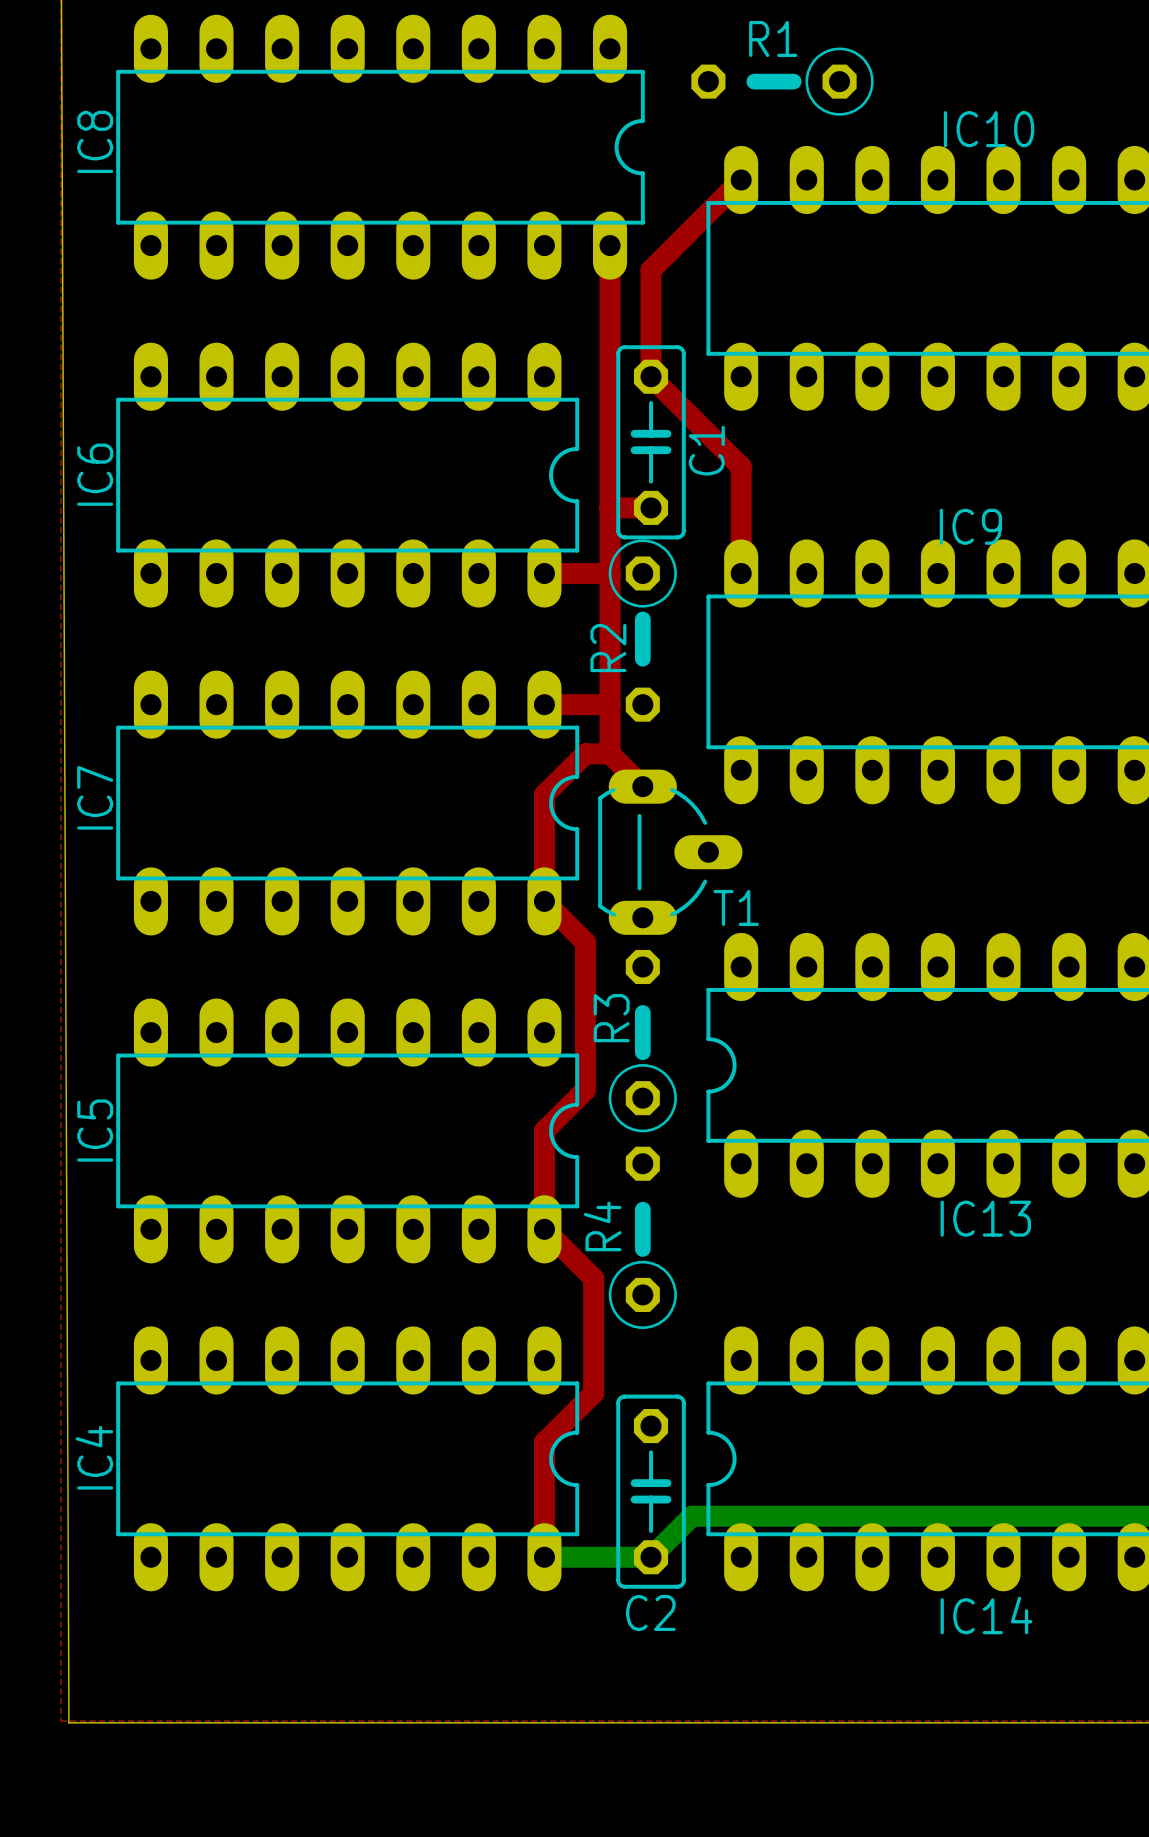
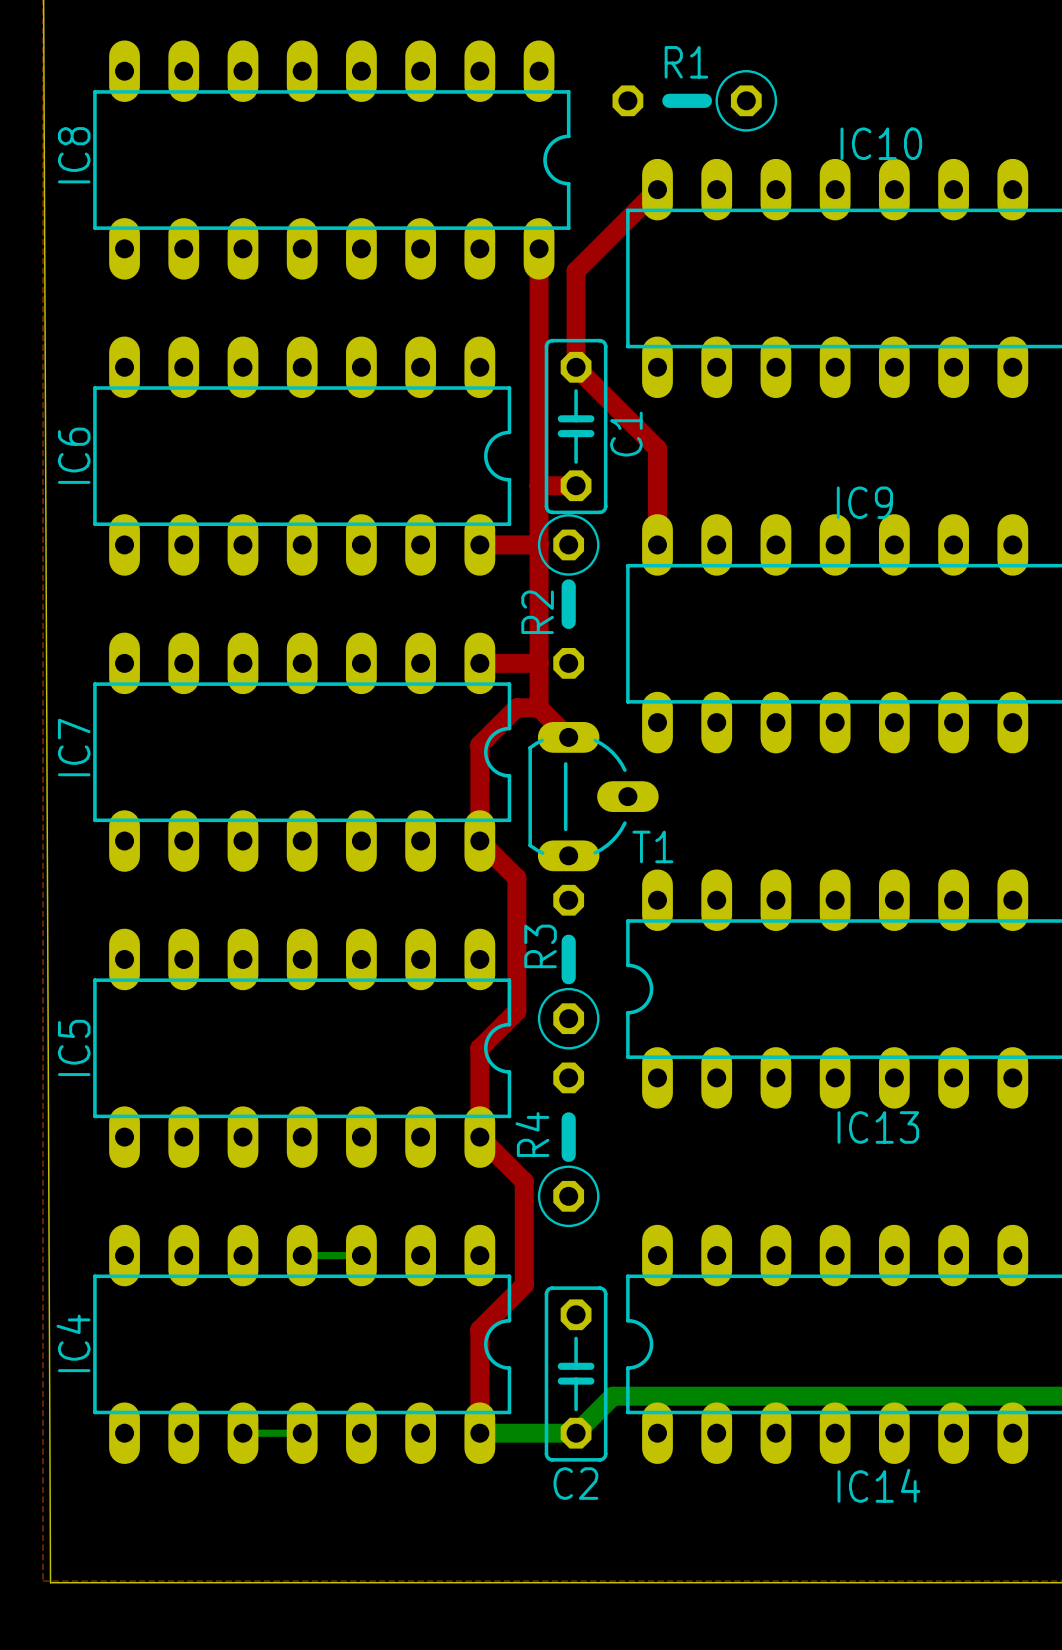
bottom track: none -> (302, 1255) (361, 1255)
bottom track: none -> (242, 1433) (302, 1433)

